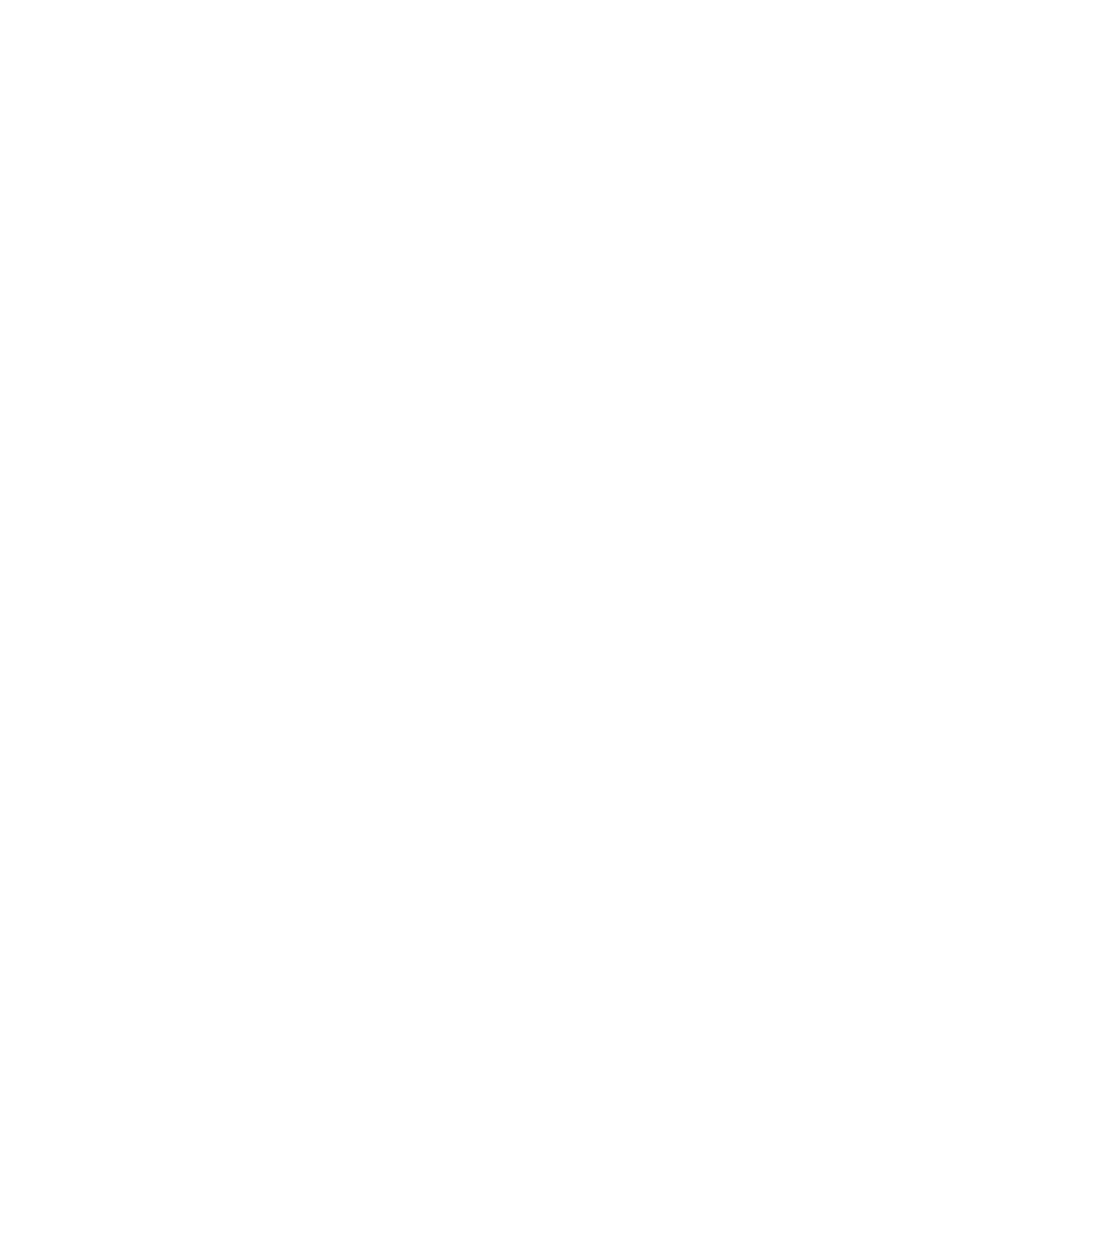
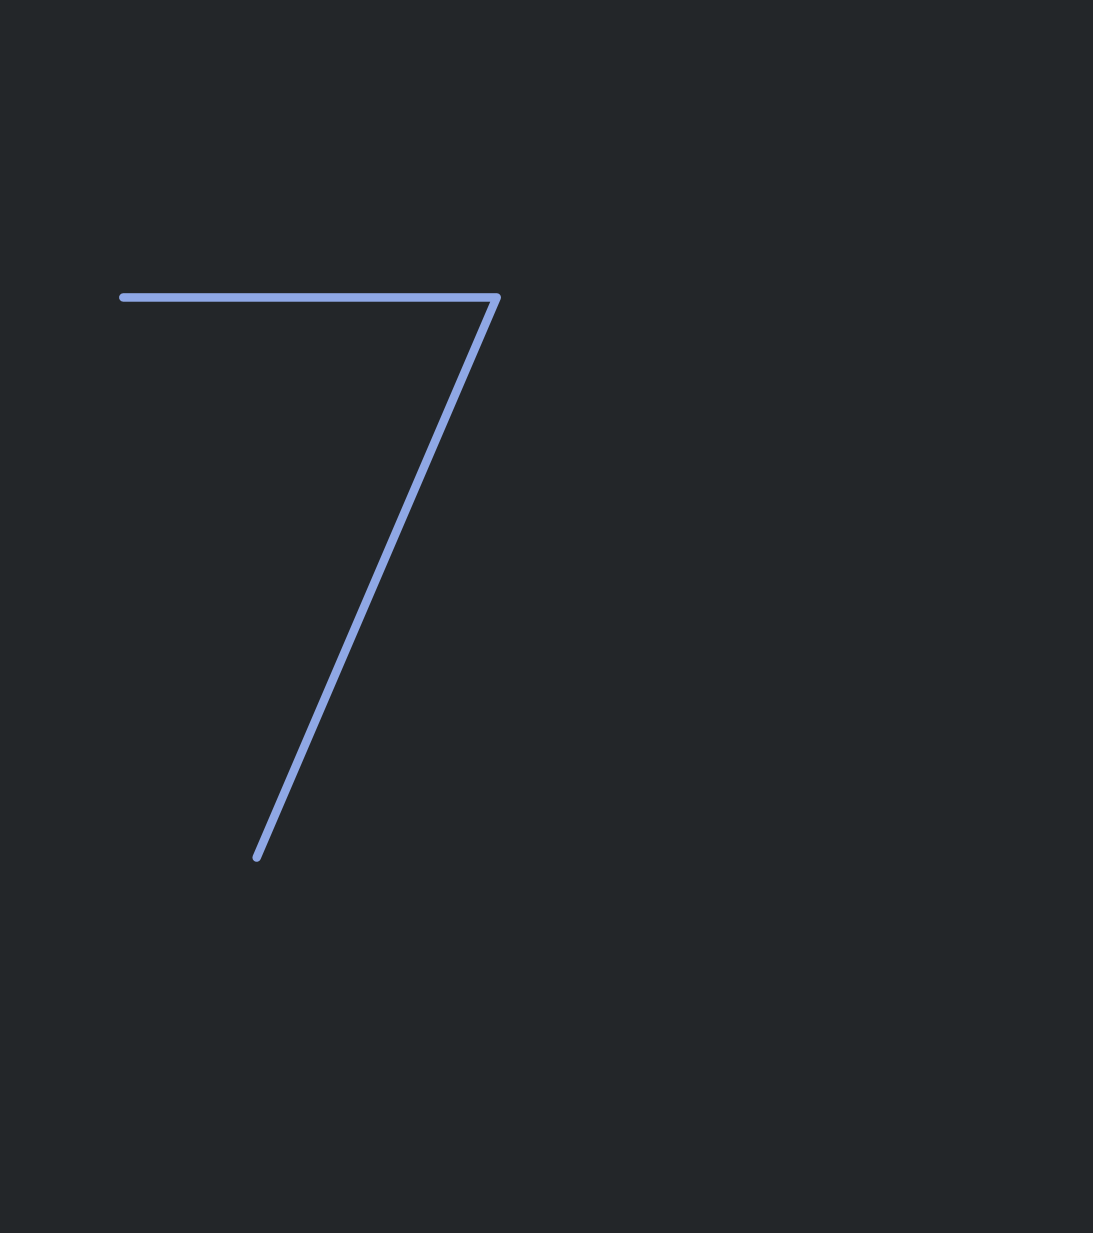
text: none -> 7 (310, 577)

